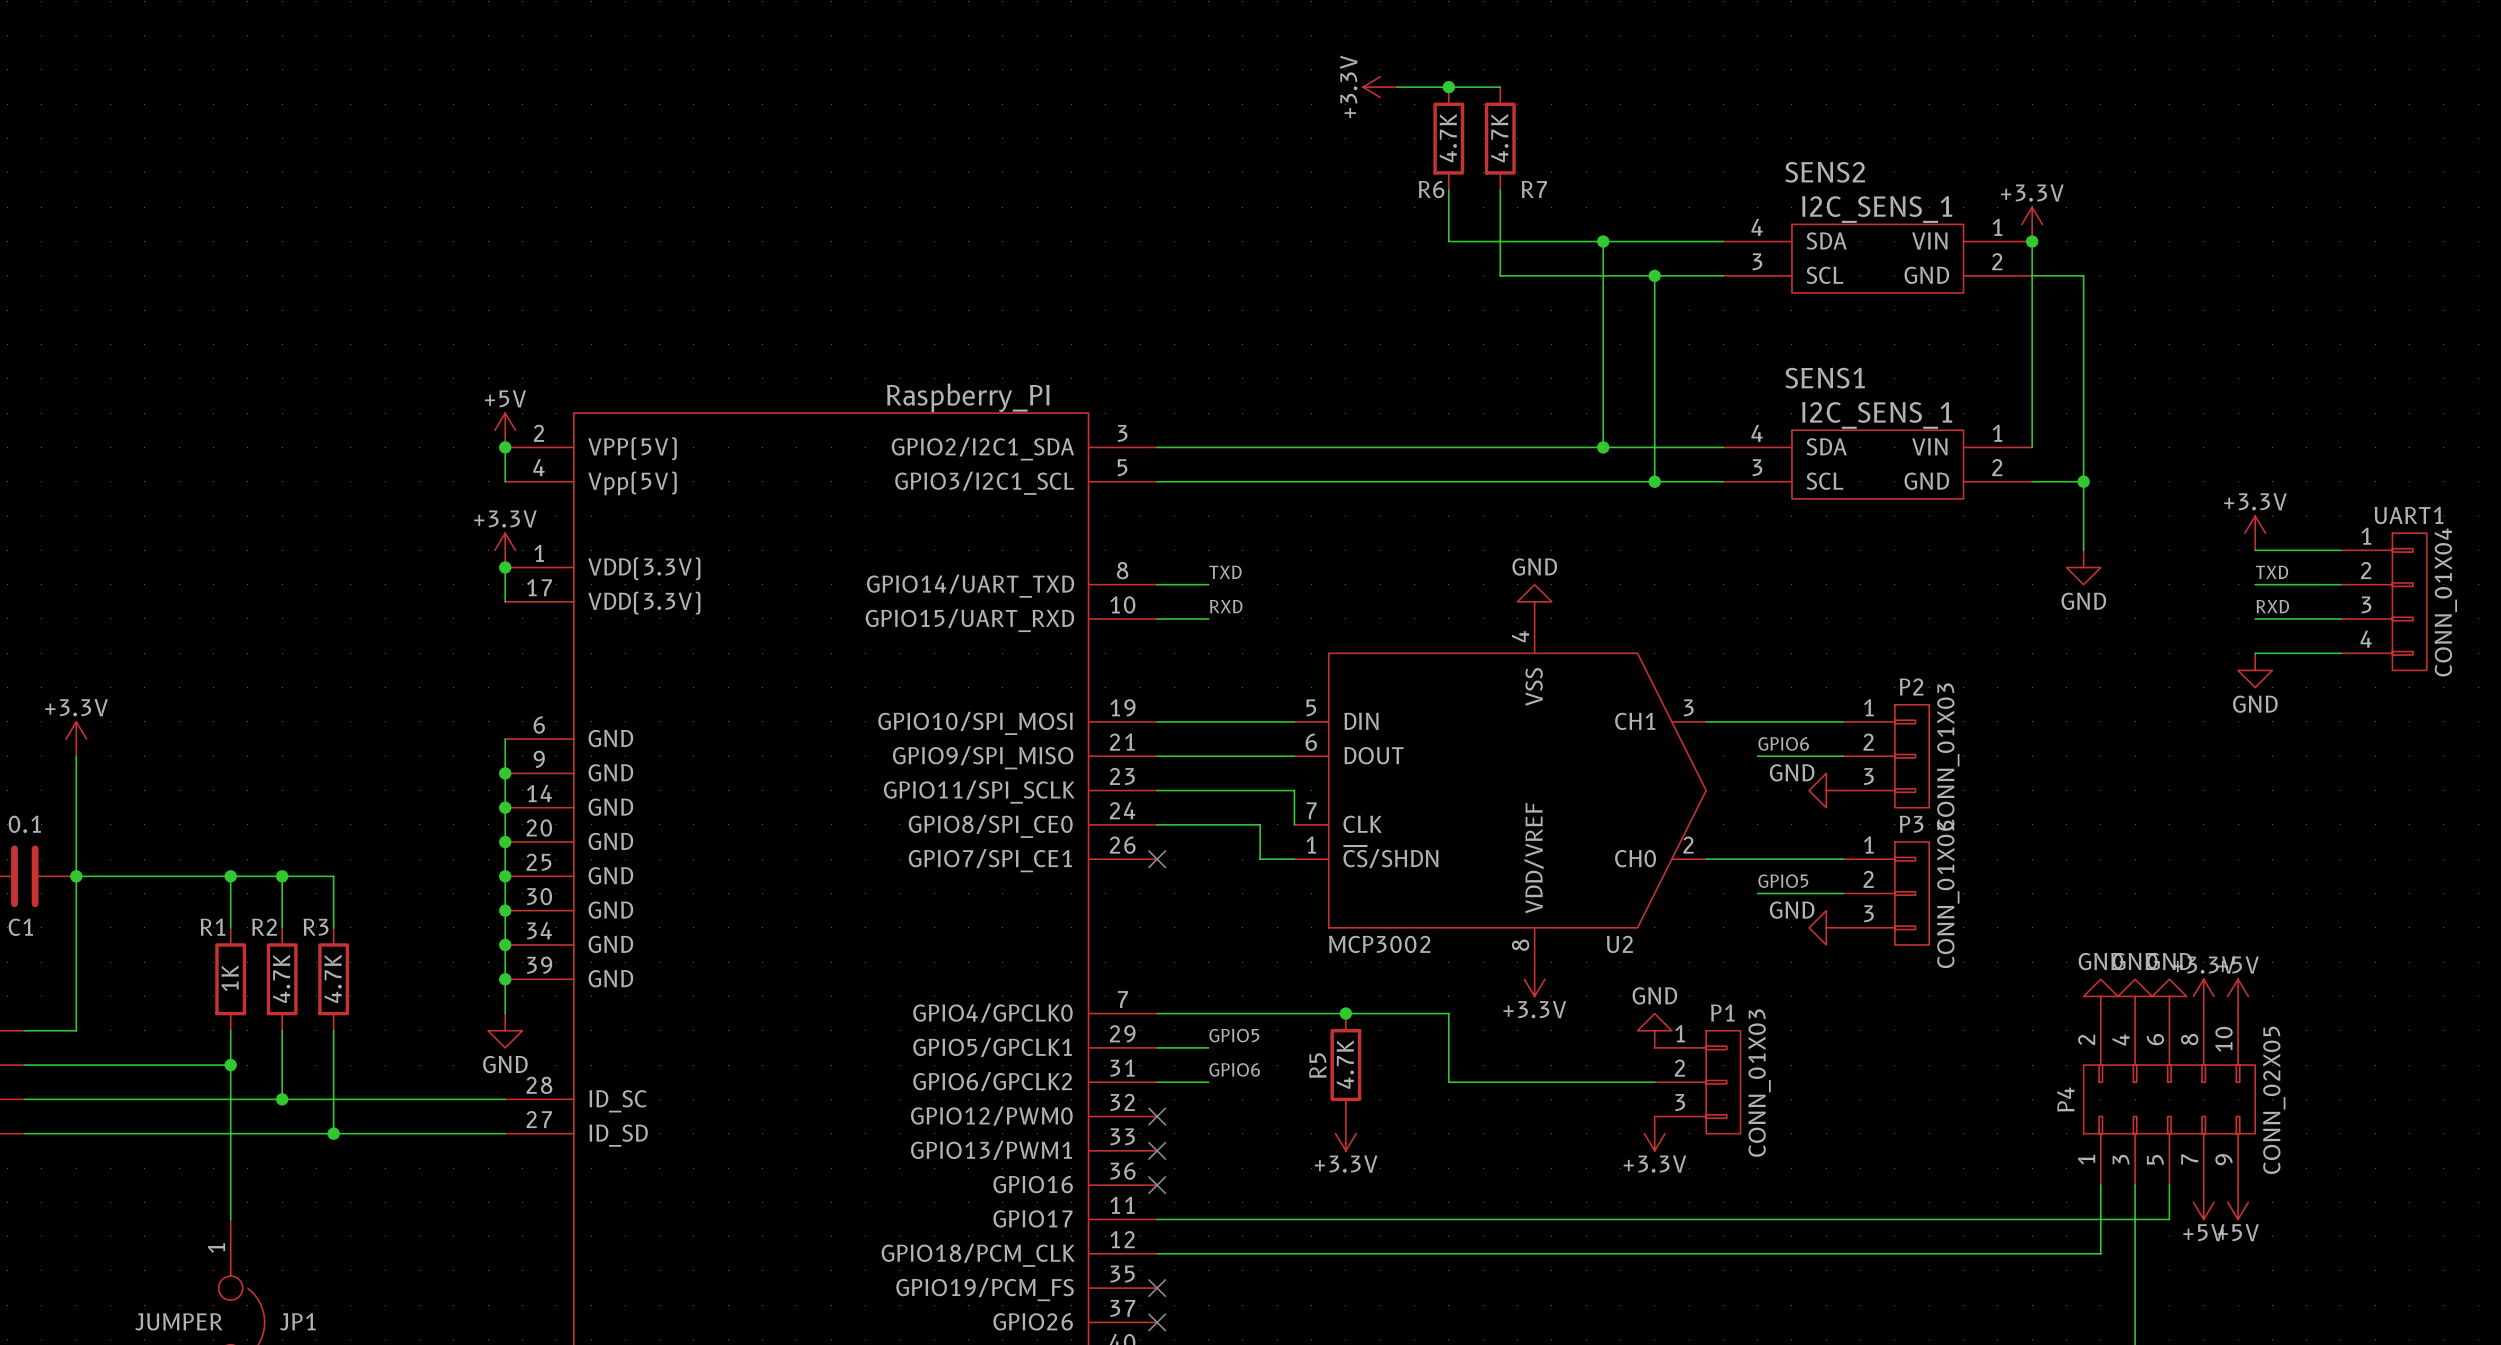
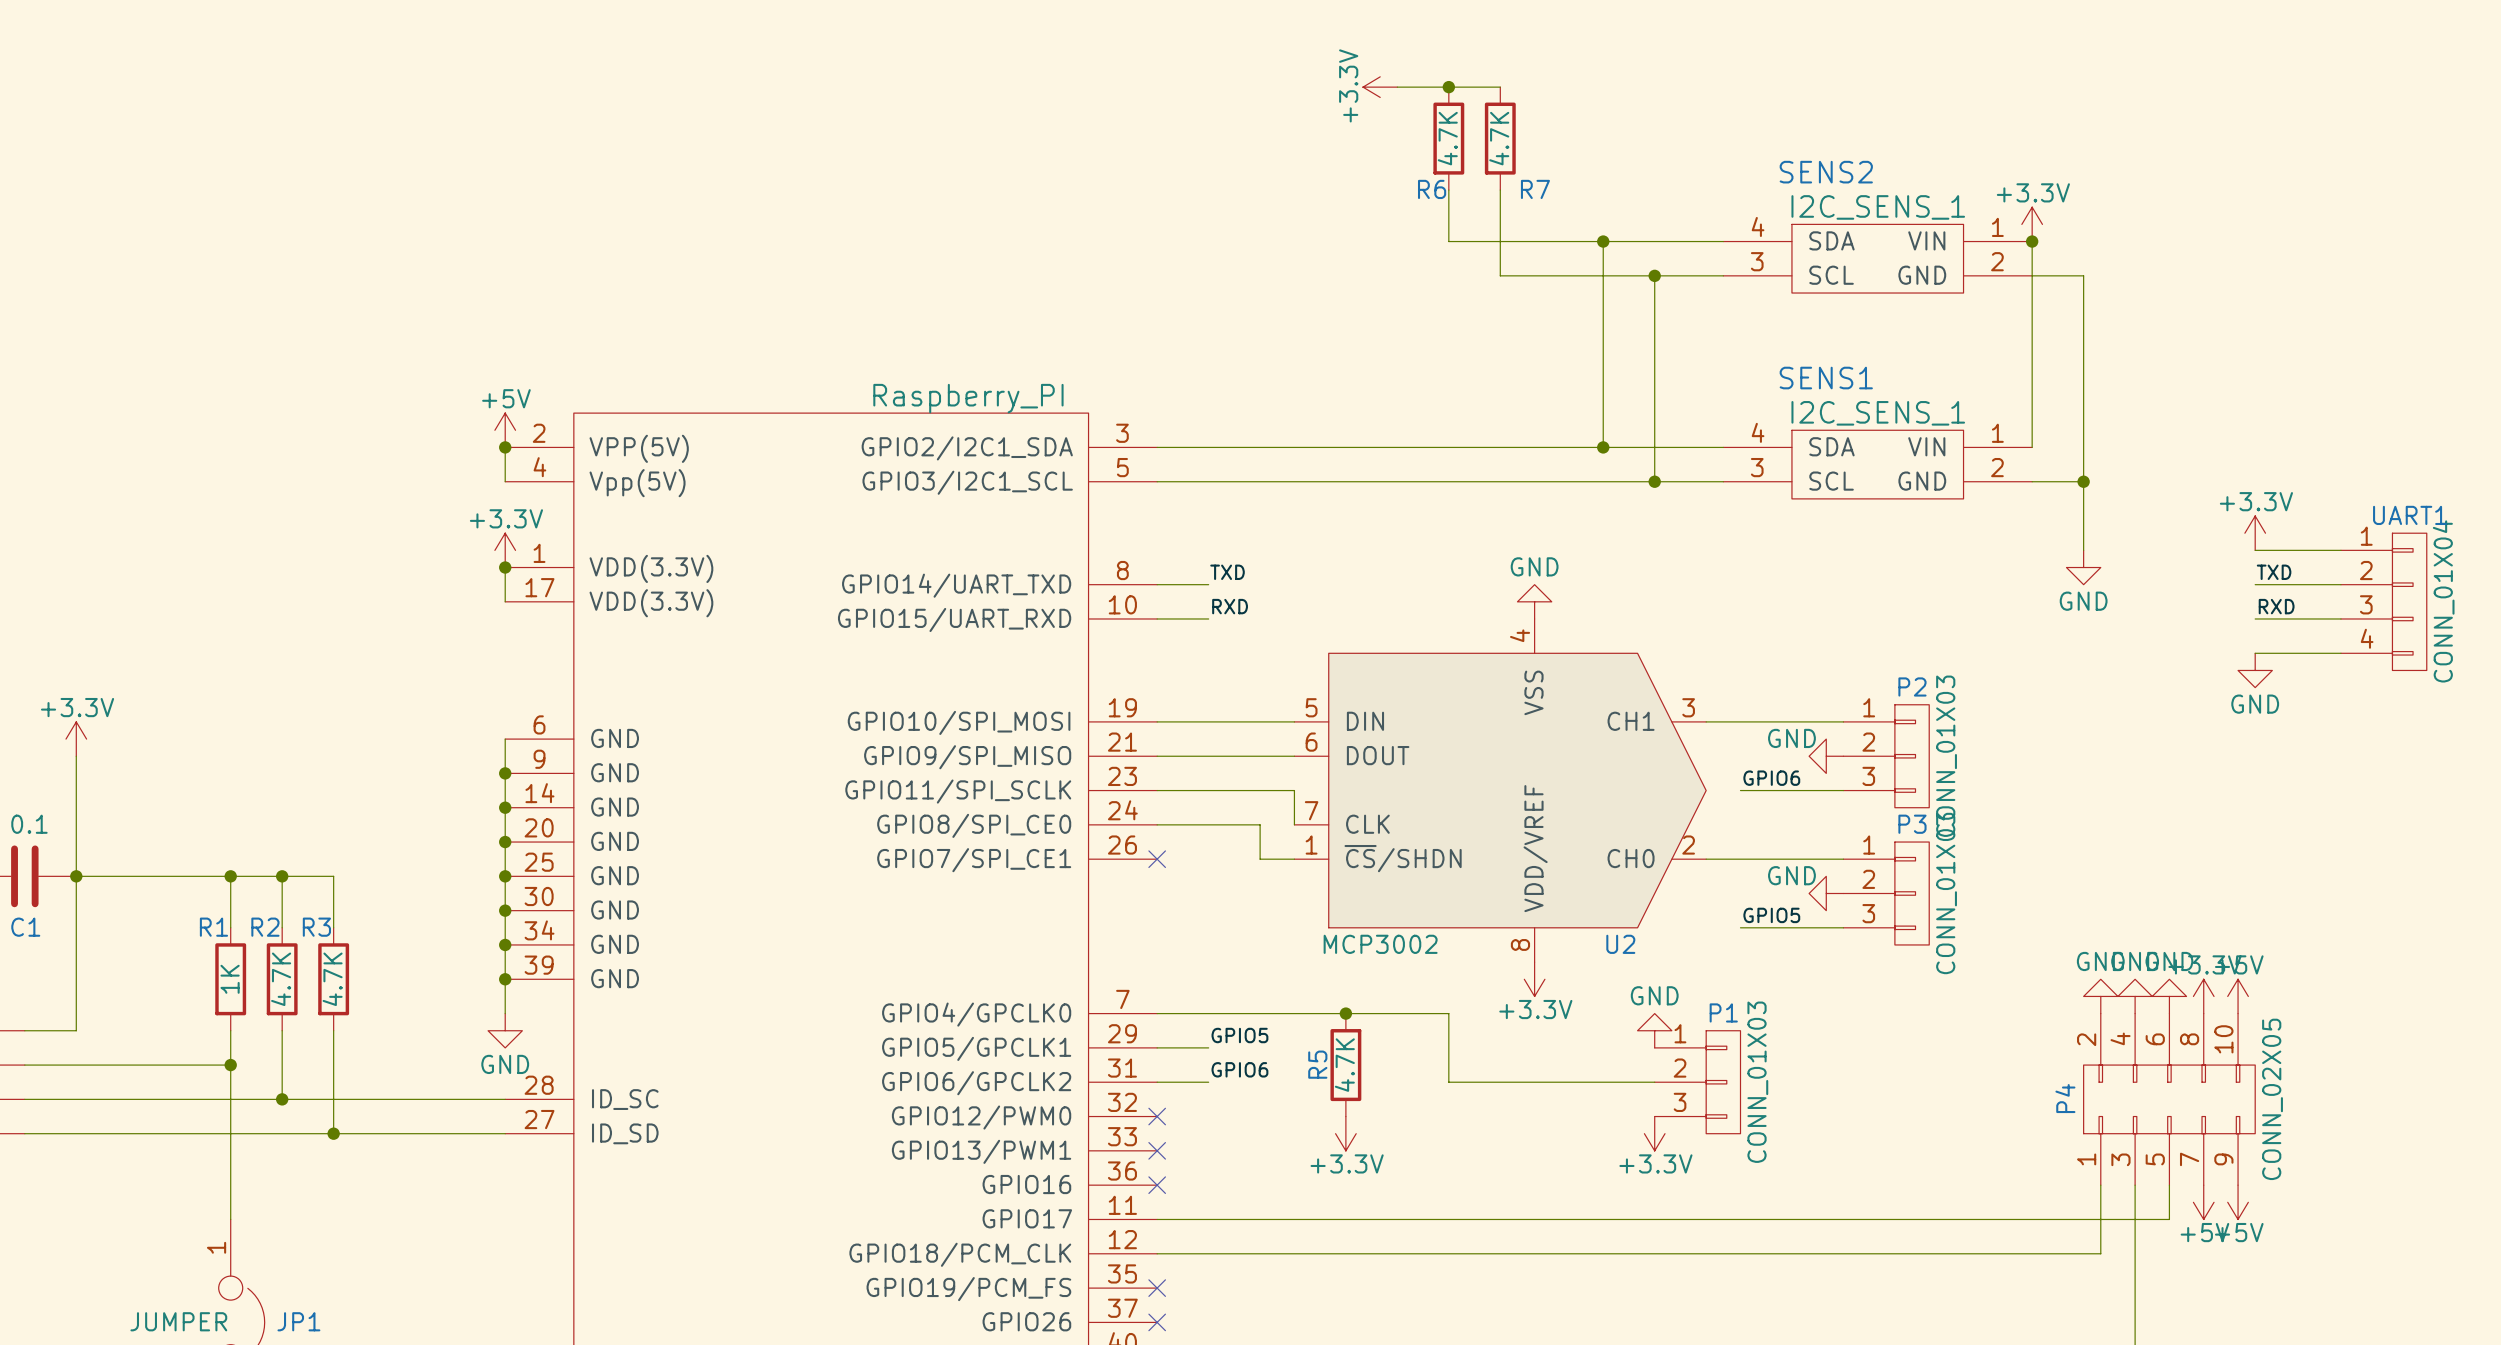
label position: GPIO6 (1783, 743) -> GPIO6 (1771, 778)
wire: (1757, 756) (1843, 756) -> none
wire: none -> (1740, 790) (1843, 790)
power symbol position: GND (1826, 790) -> GND (1826, 756)
label position: GPIO5 (1783, 881) -> GPIO5 (1771, 915)
wire: (1757, 893) (1843, 893) -> none
wire: none -> (1740, 927) (1843, 927)
power symbol position: GND (1826, 927) -> GND (1826, 893)

